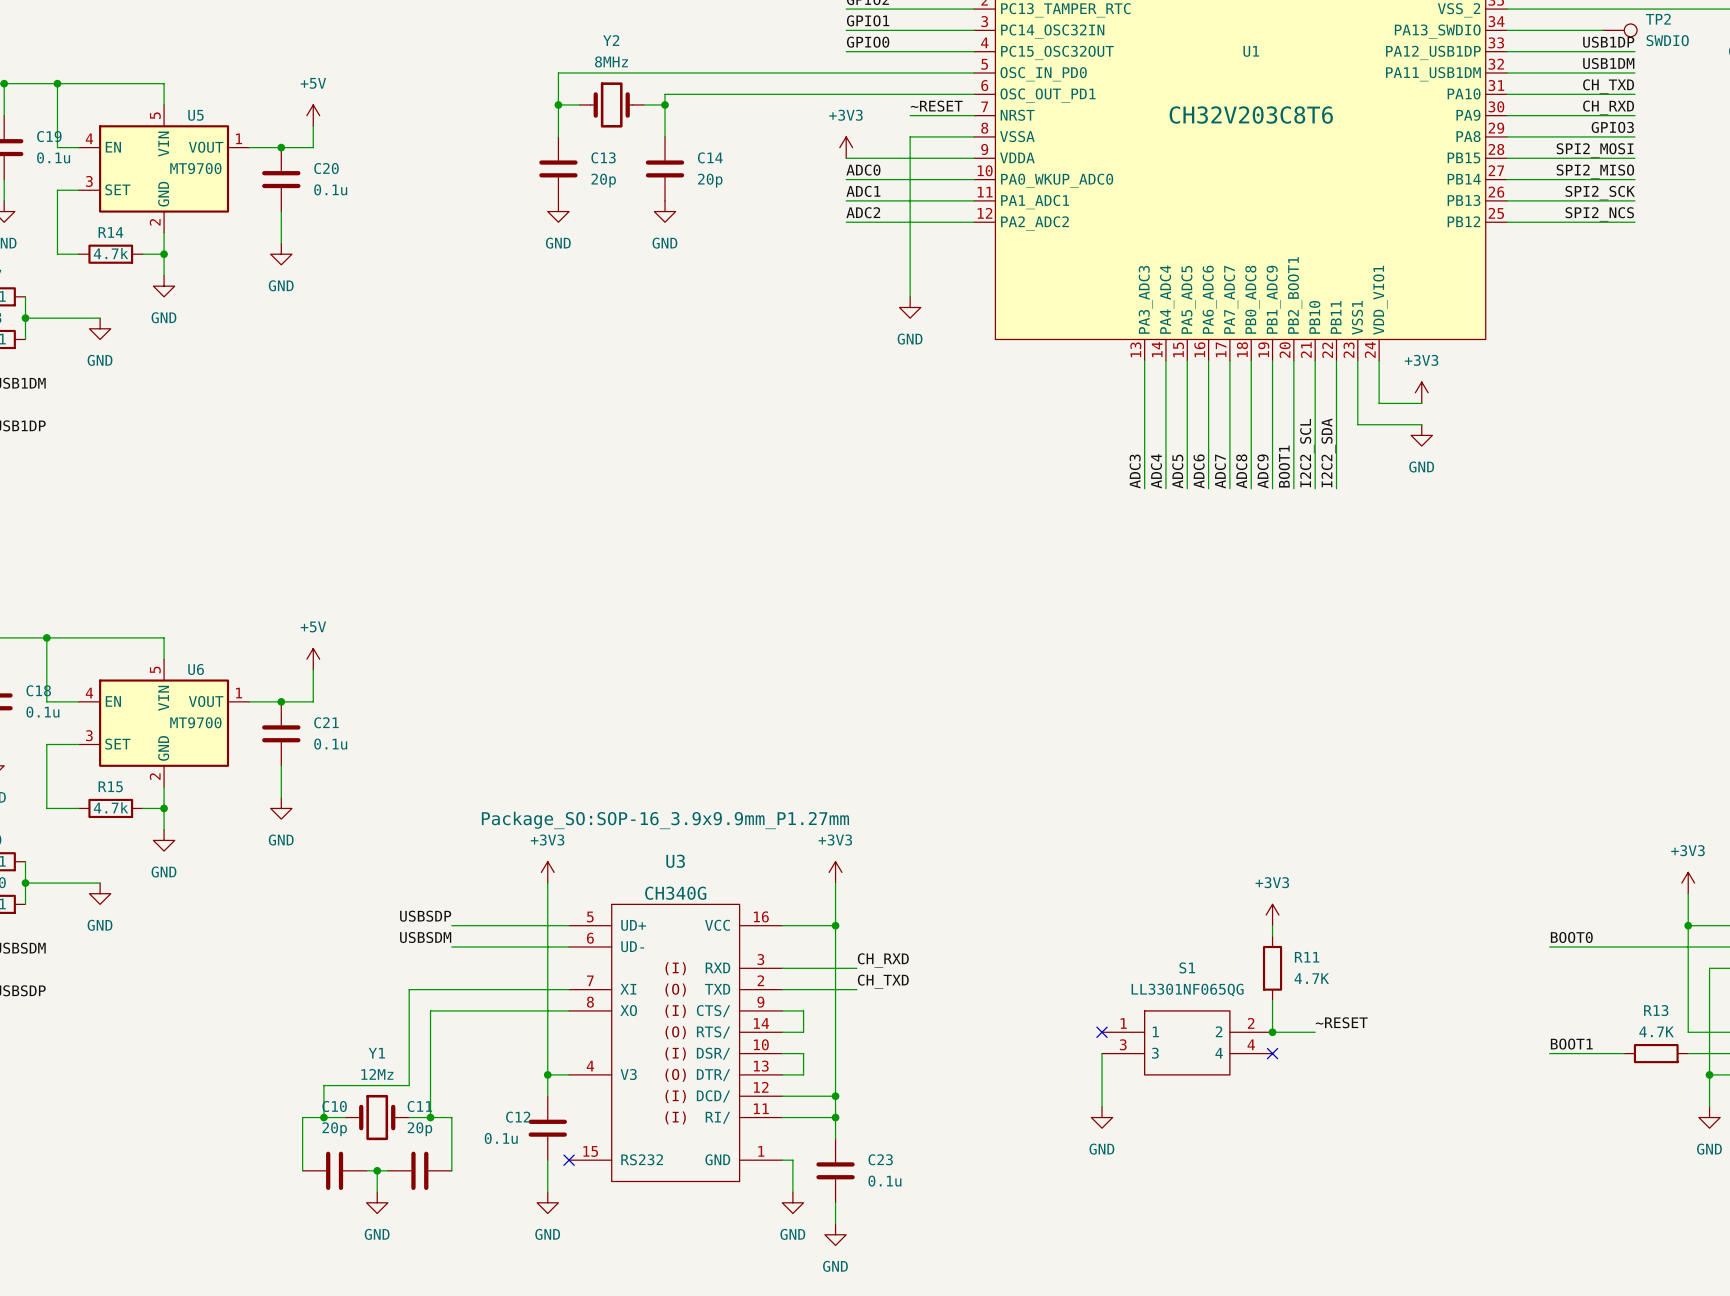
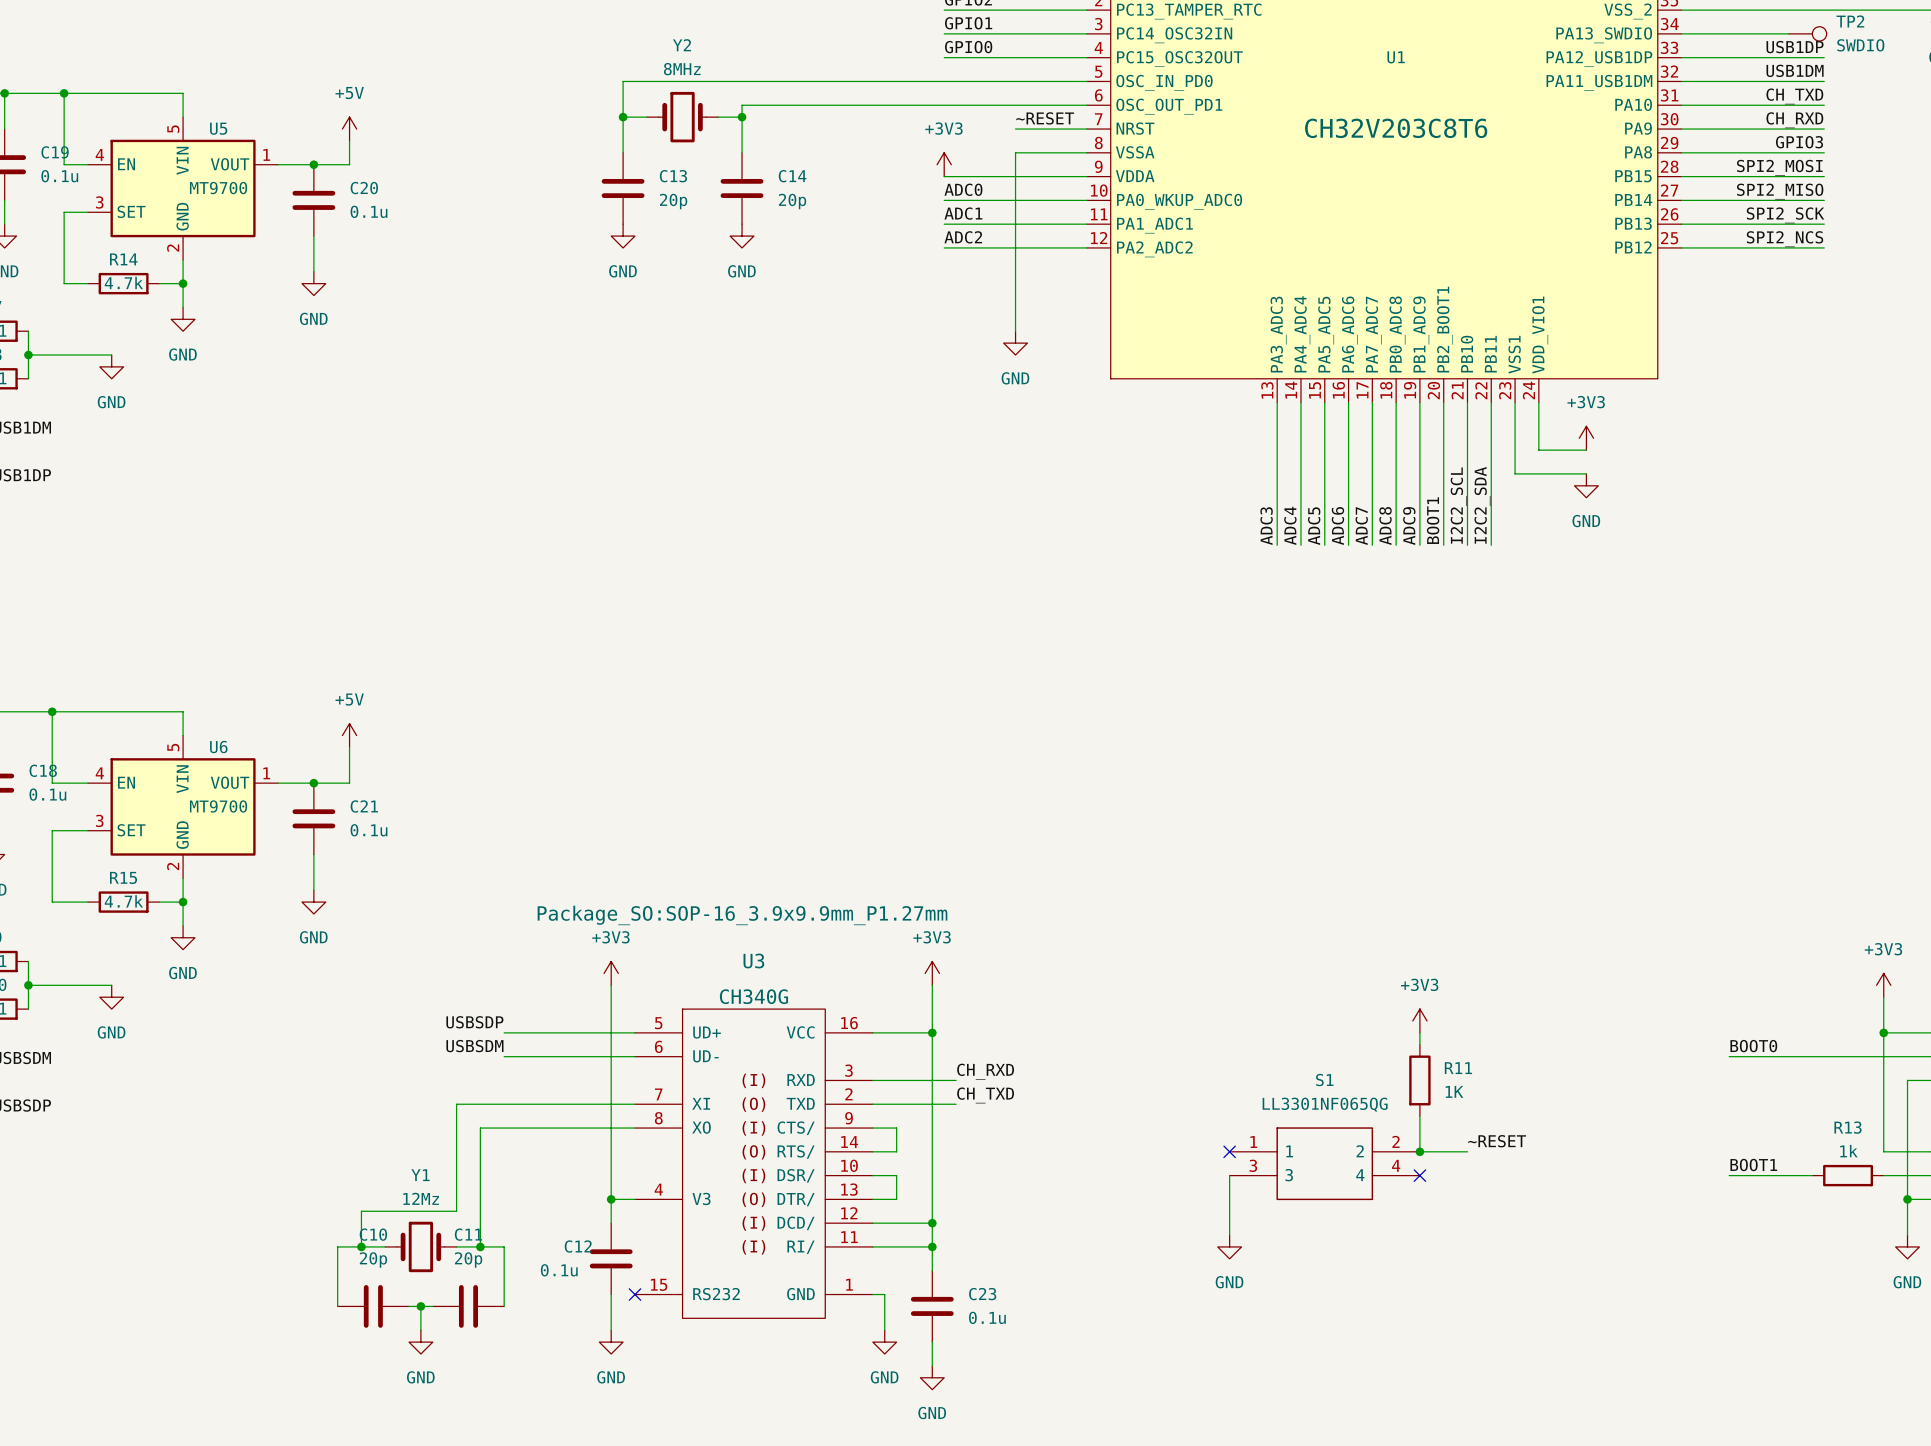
R11 value: 4.7K (1311, 978) -> 1K (1454, 1091)
R13 value: 4.7K (1656, 1031) -> 1k (1848, 1151)

